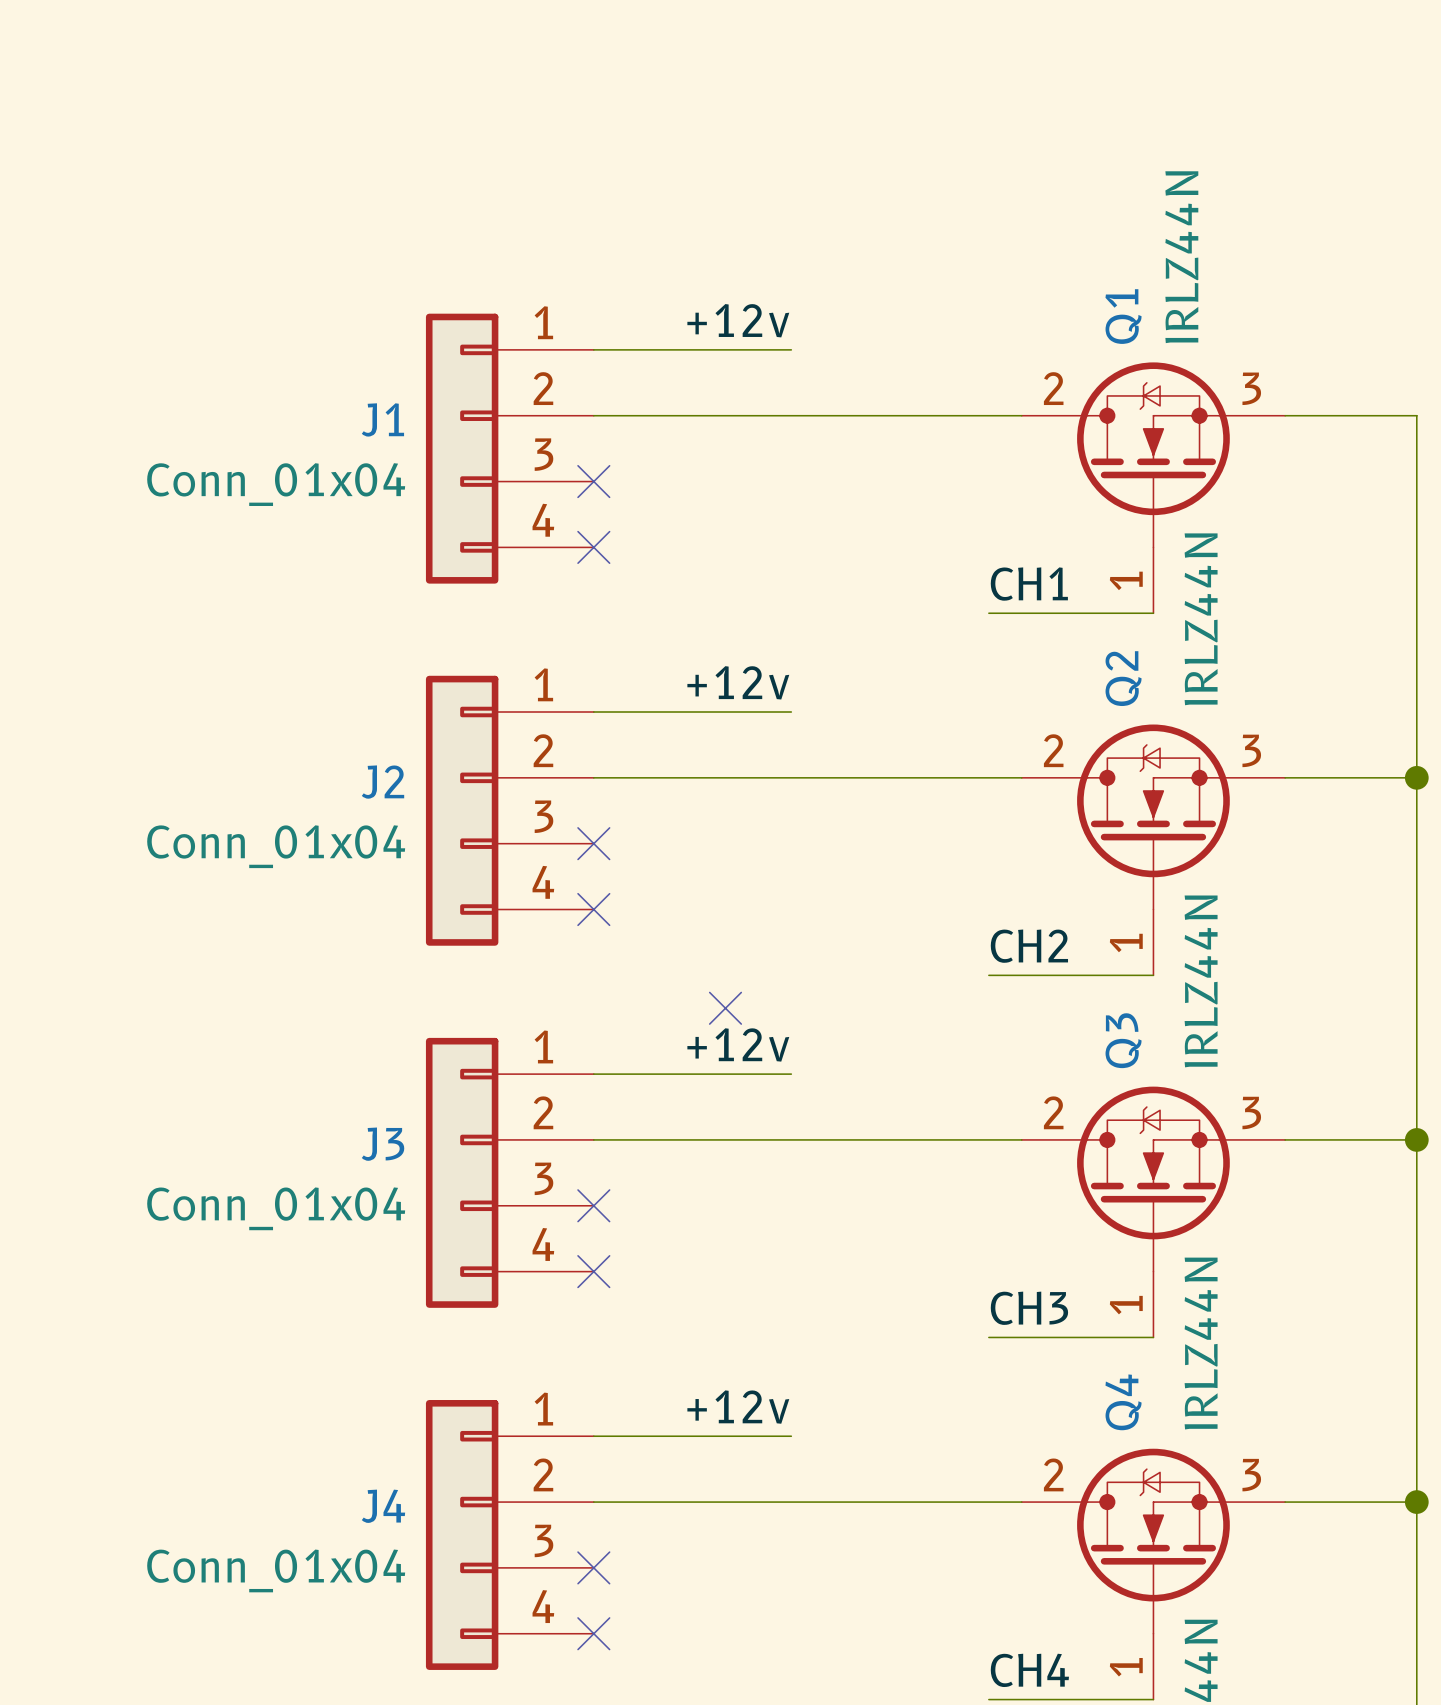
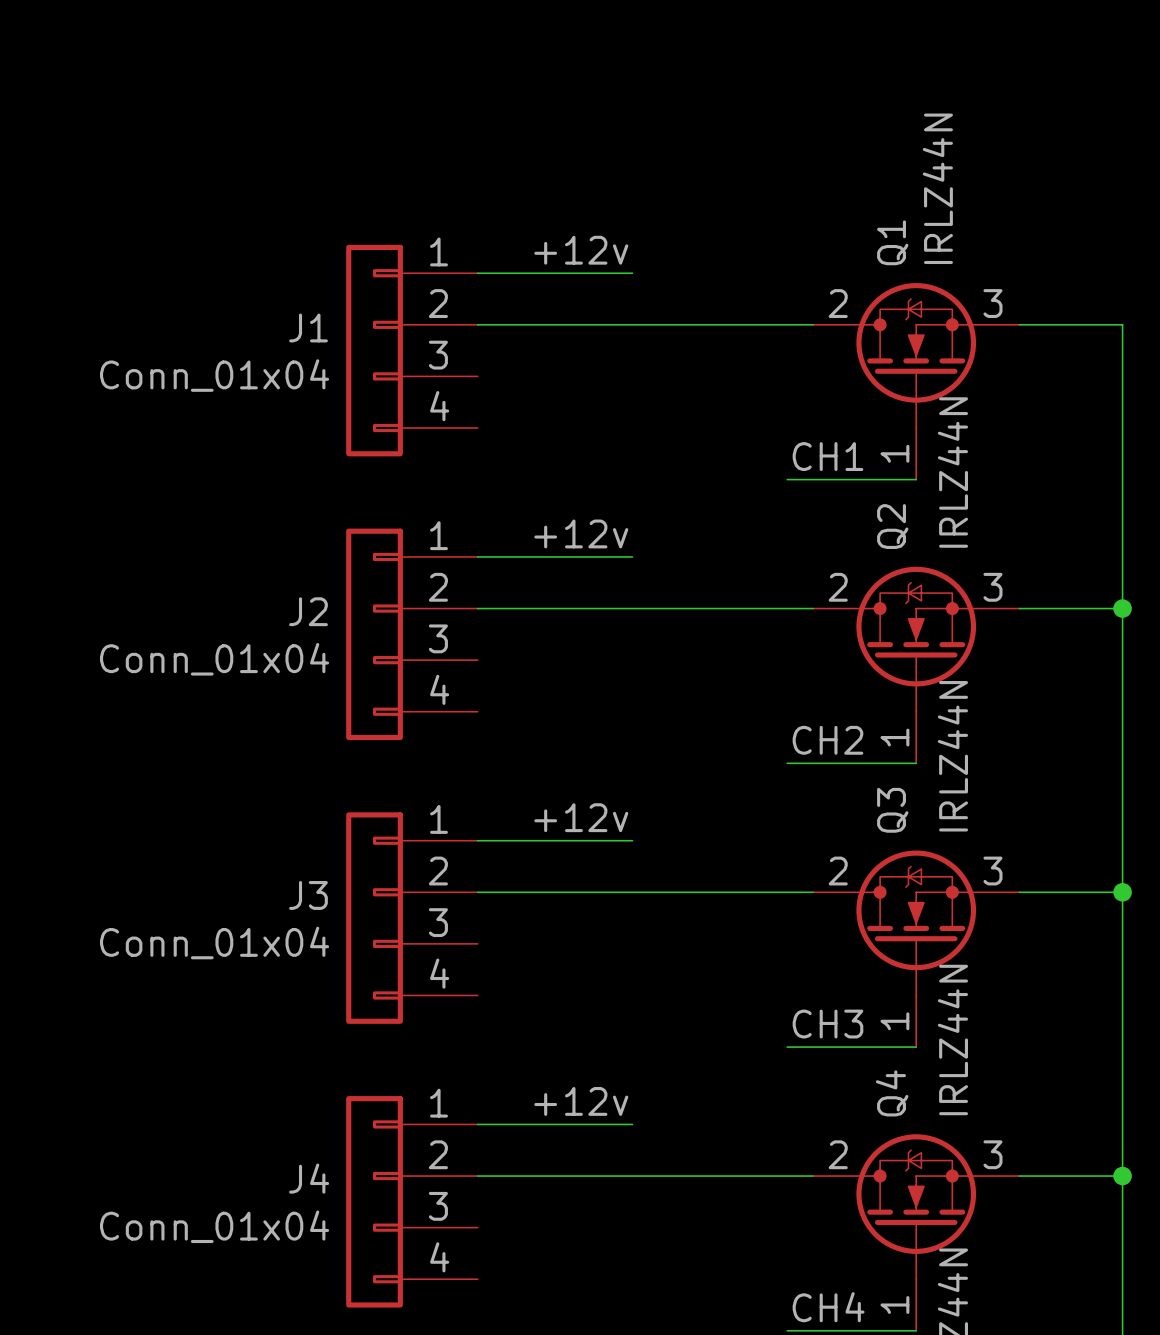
no-connect mark: (593, 481) -> none
no-connect mark: (593, 547) -> none
no-connect mark: (593, 843) -> none
no-connect mark: (593, 909) -> none
no-connect mark: (725, 1008) -> none
no-connect mark: (593, 1205) -> none
no-connect mark: (593, 1271) -> none
no-connect mark: (593, 1567) -> none
no-connect mark: (593, 1633) -> none

